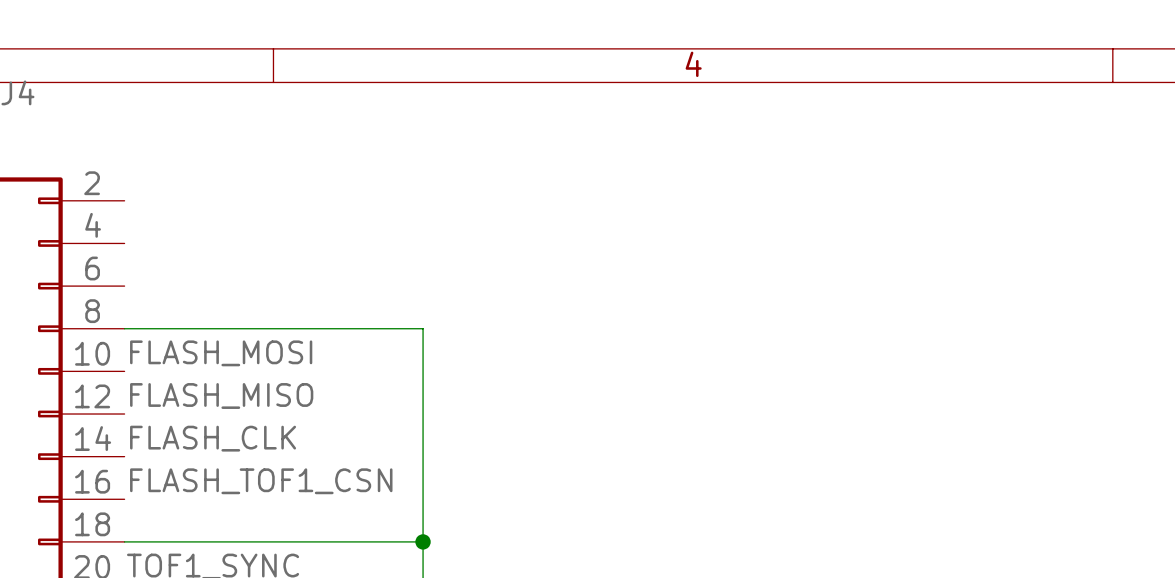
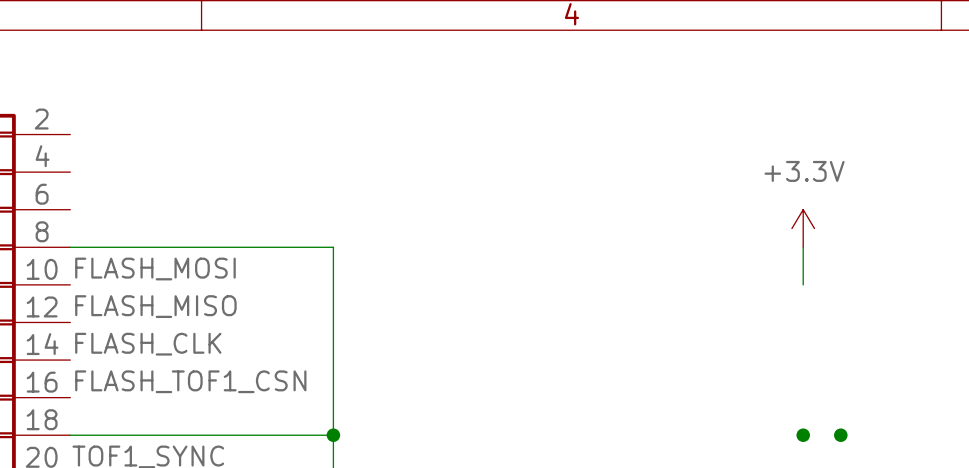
power symbol: none -> +3.3V (803, 228)
wire: none -> (803, 247) (803, 284)
junction: none -> (803, 435)
junction: none -> (840, 435)

